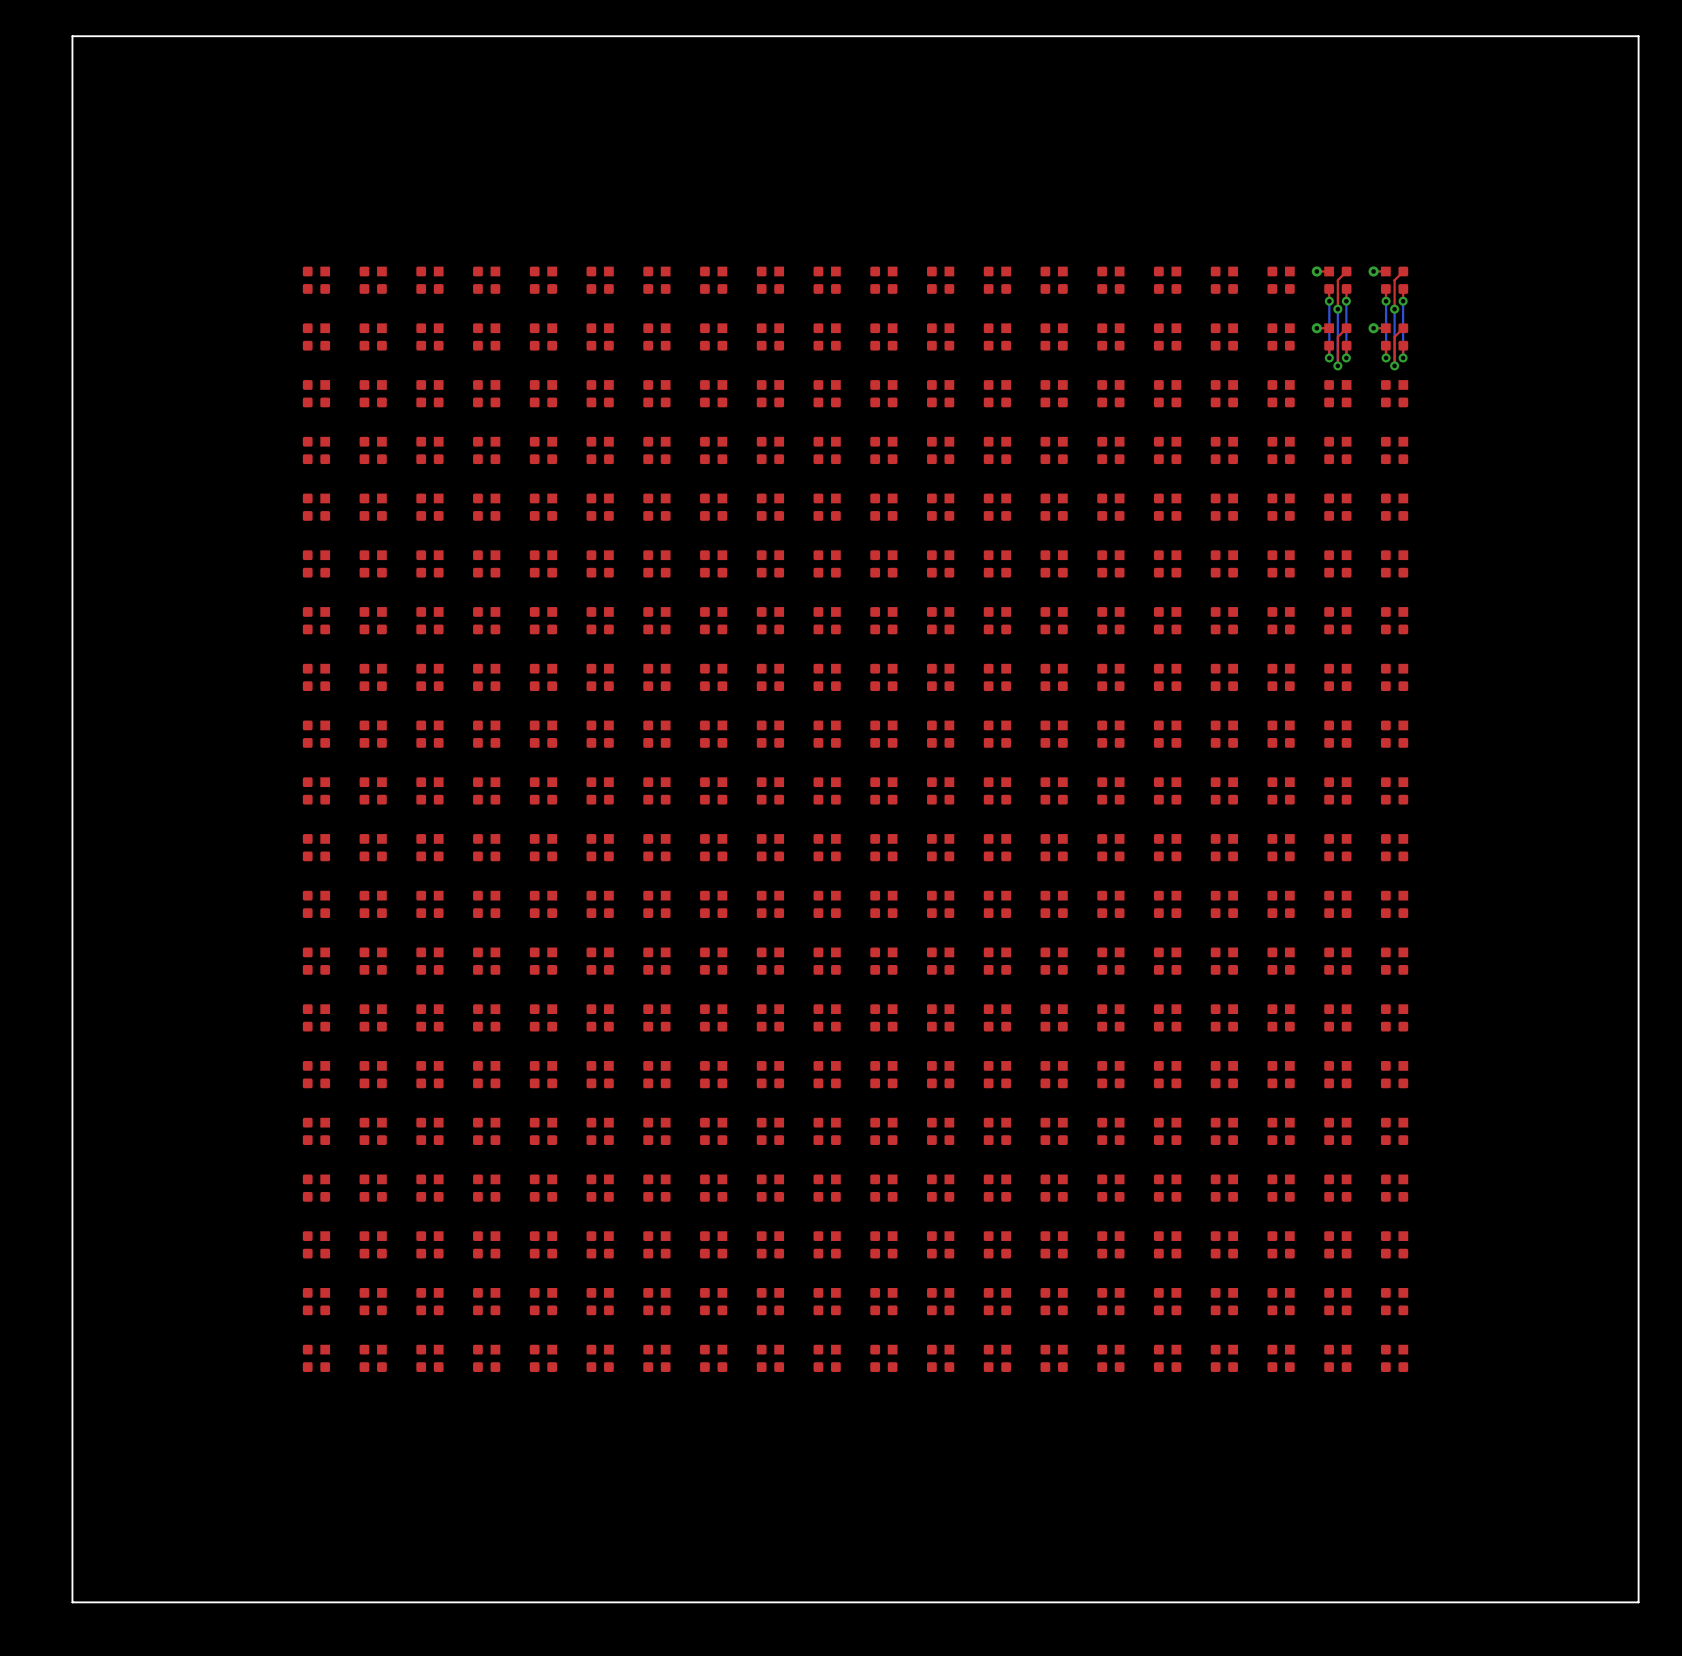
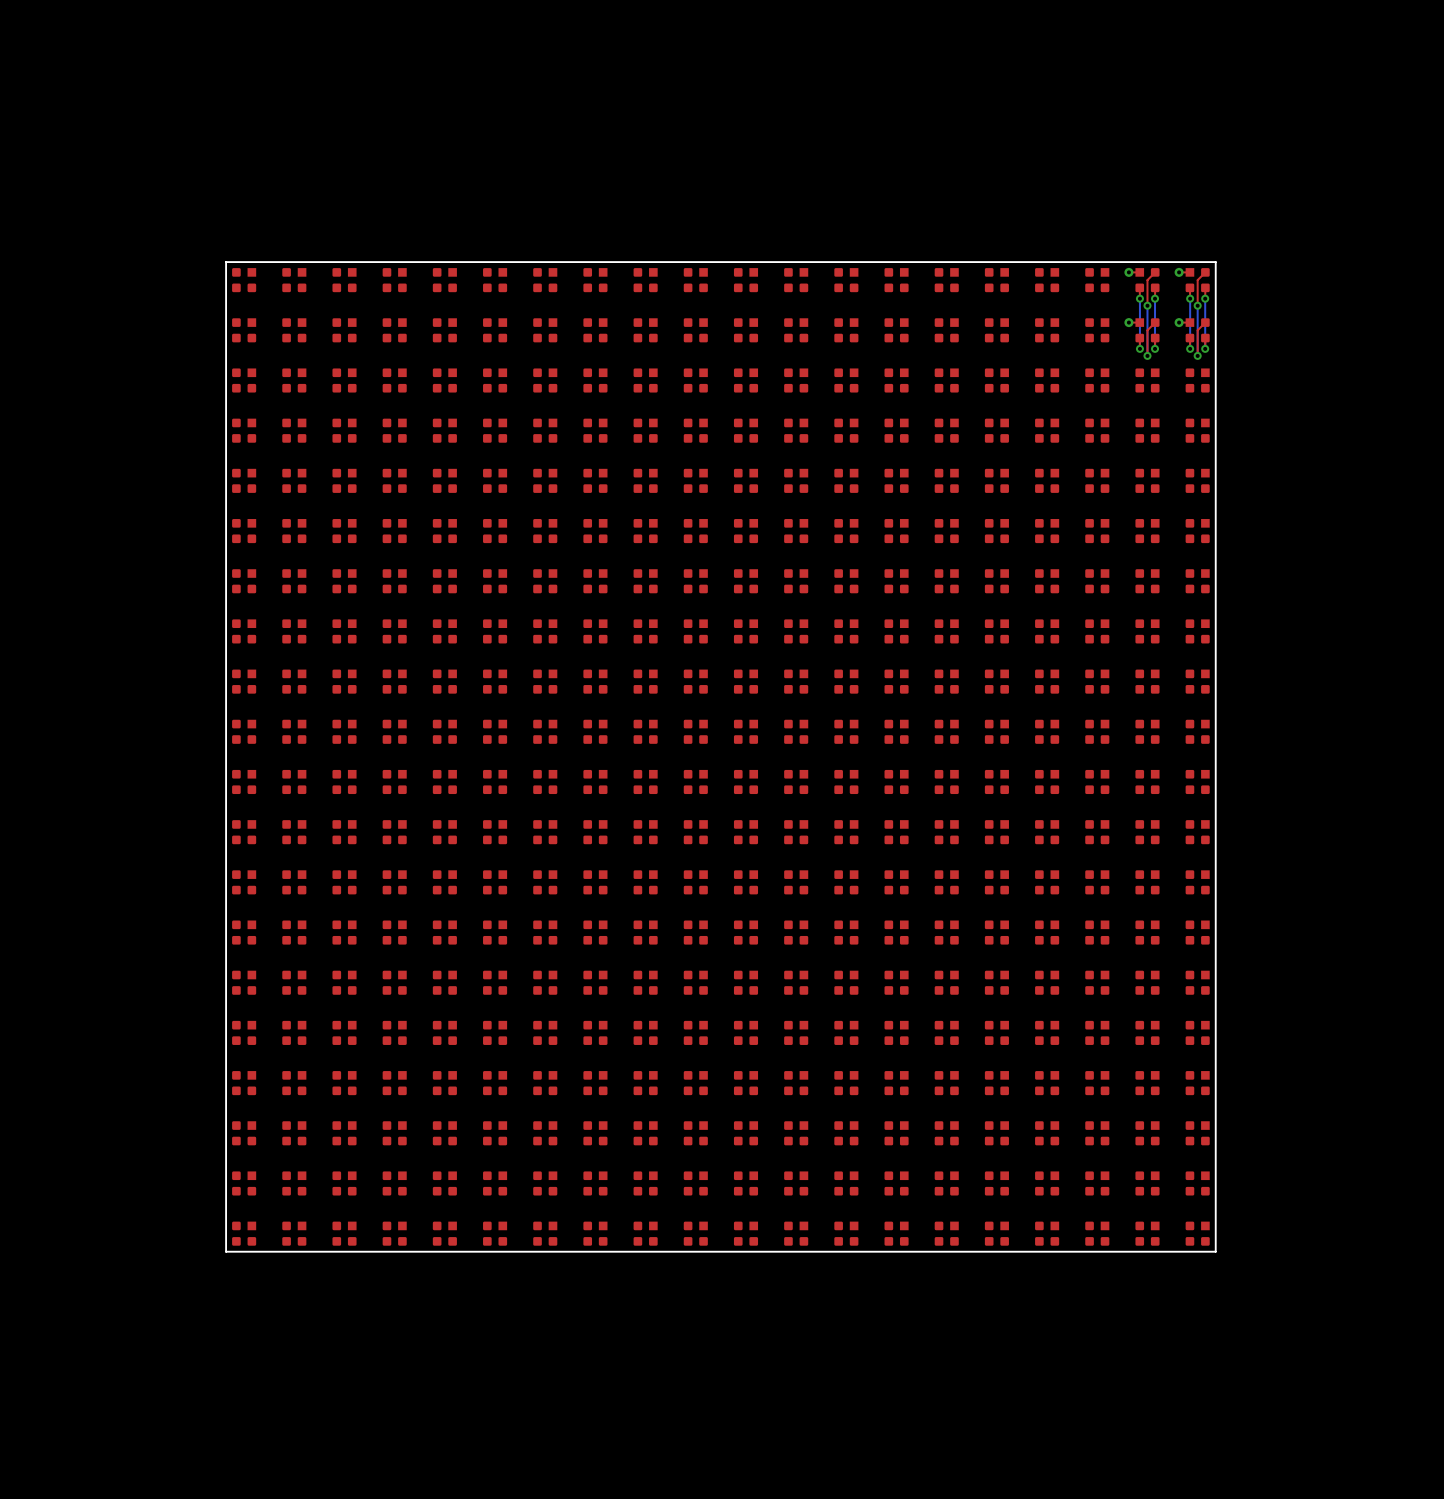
board edge: (72, 36) (1638, 36) (1638, 1602) (72, 1602) (72, 36) -> (226, 262) (226, 1251) (1215, 1251) (1215, 262) (226, 262)

